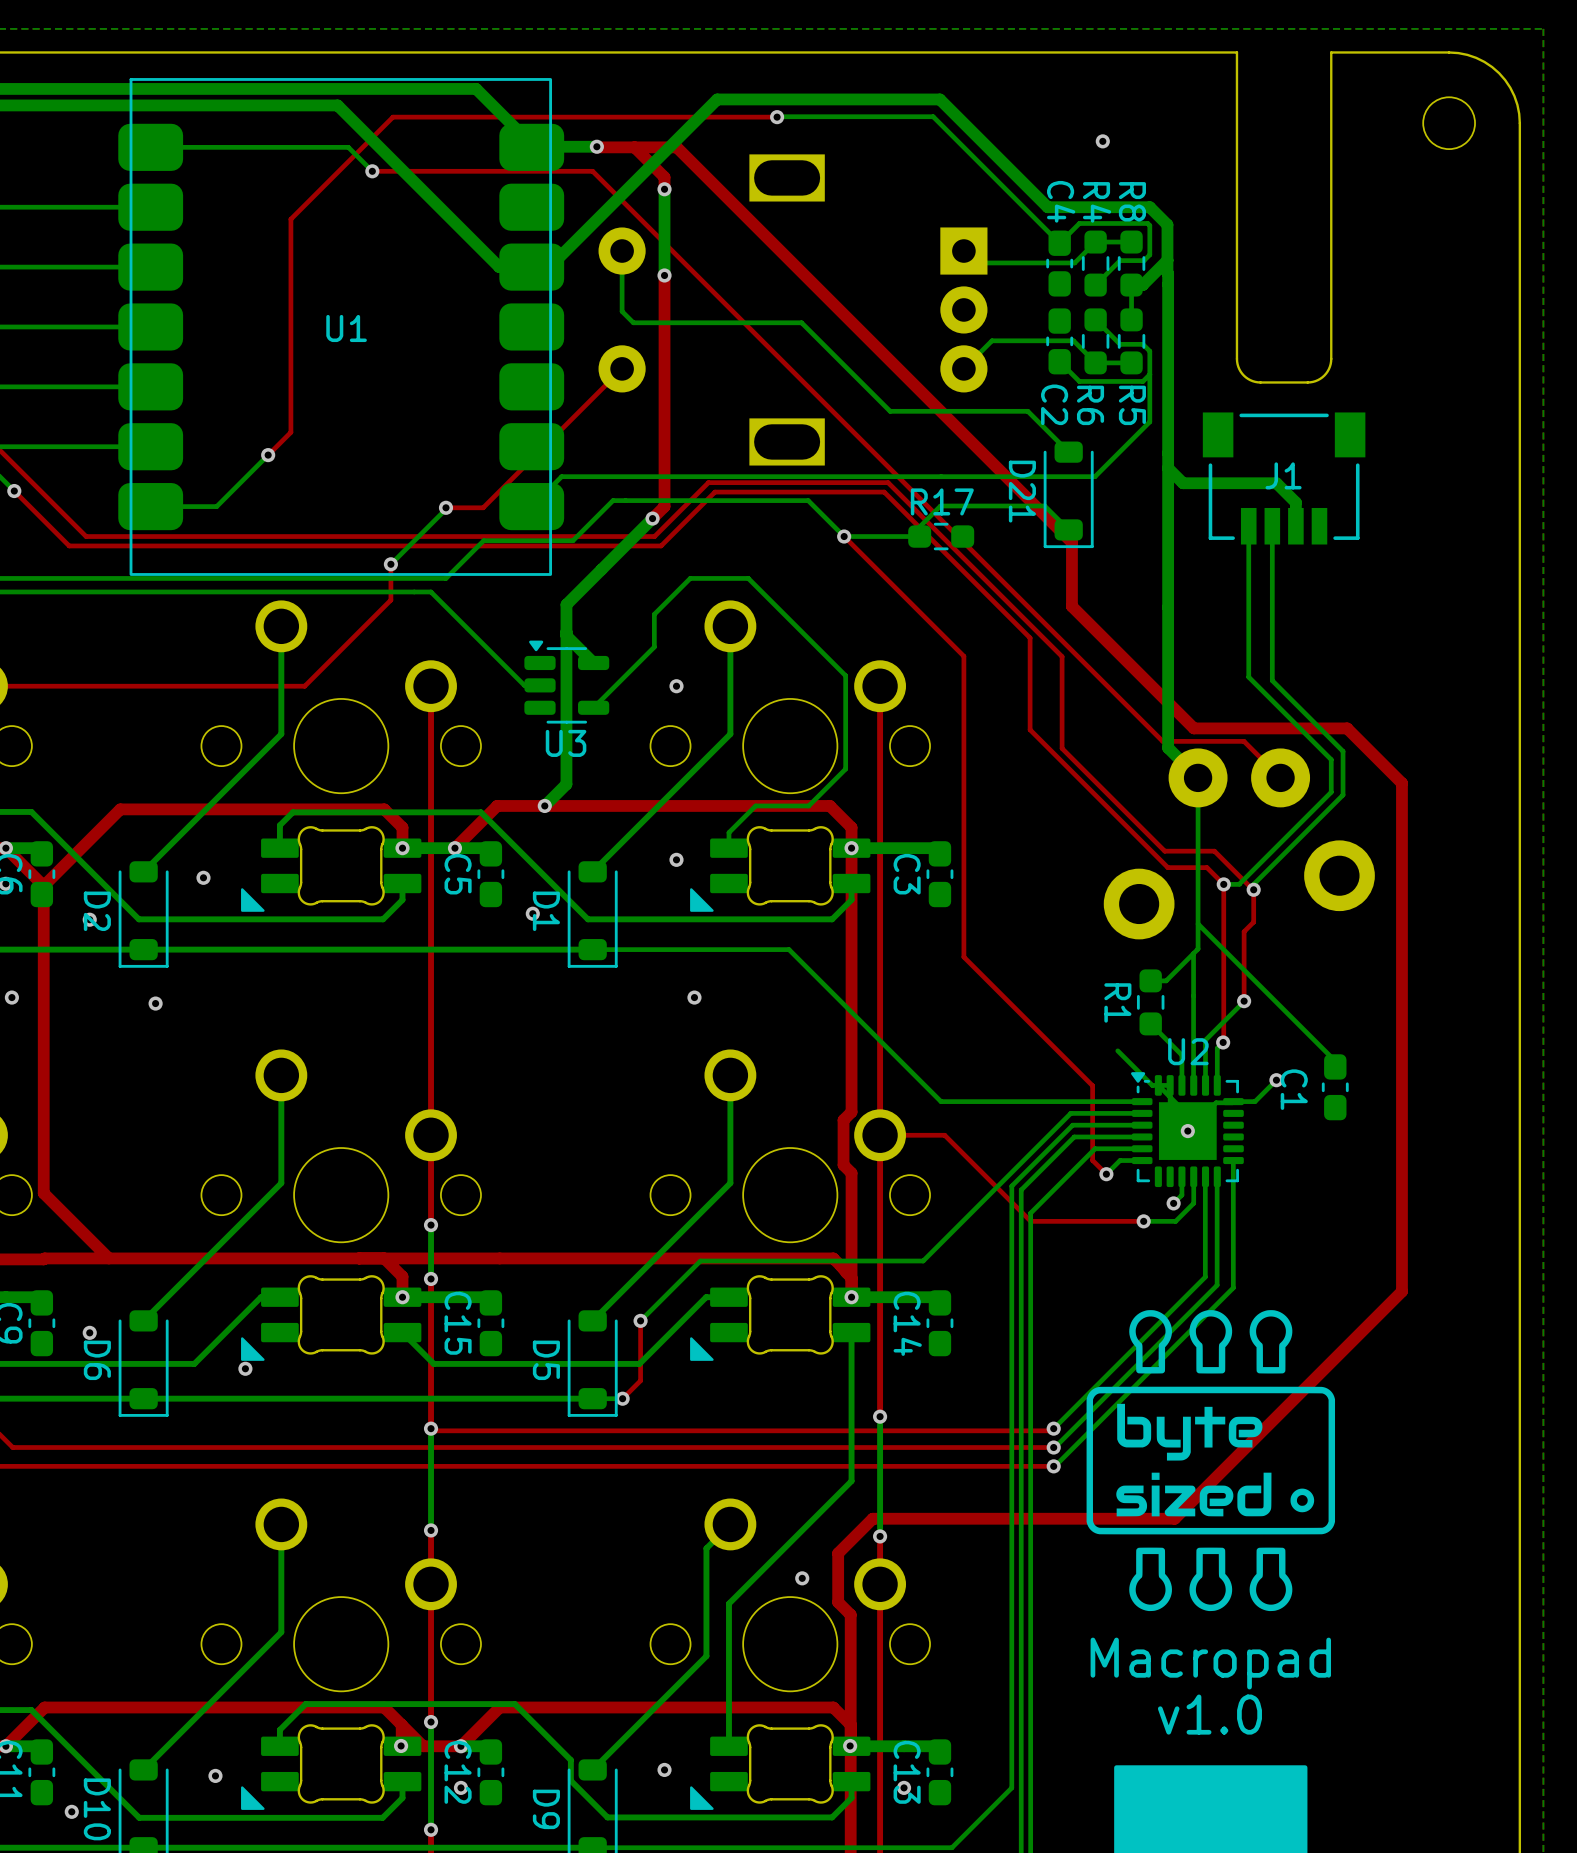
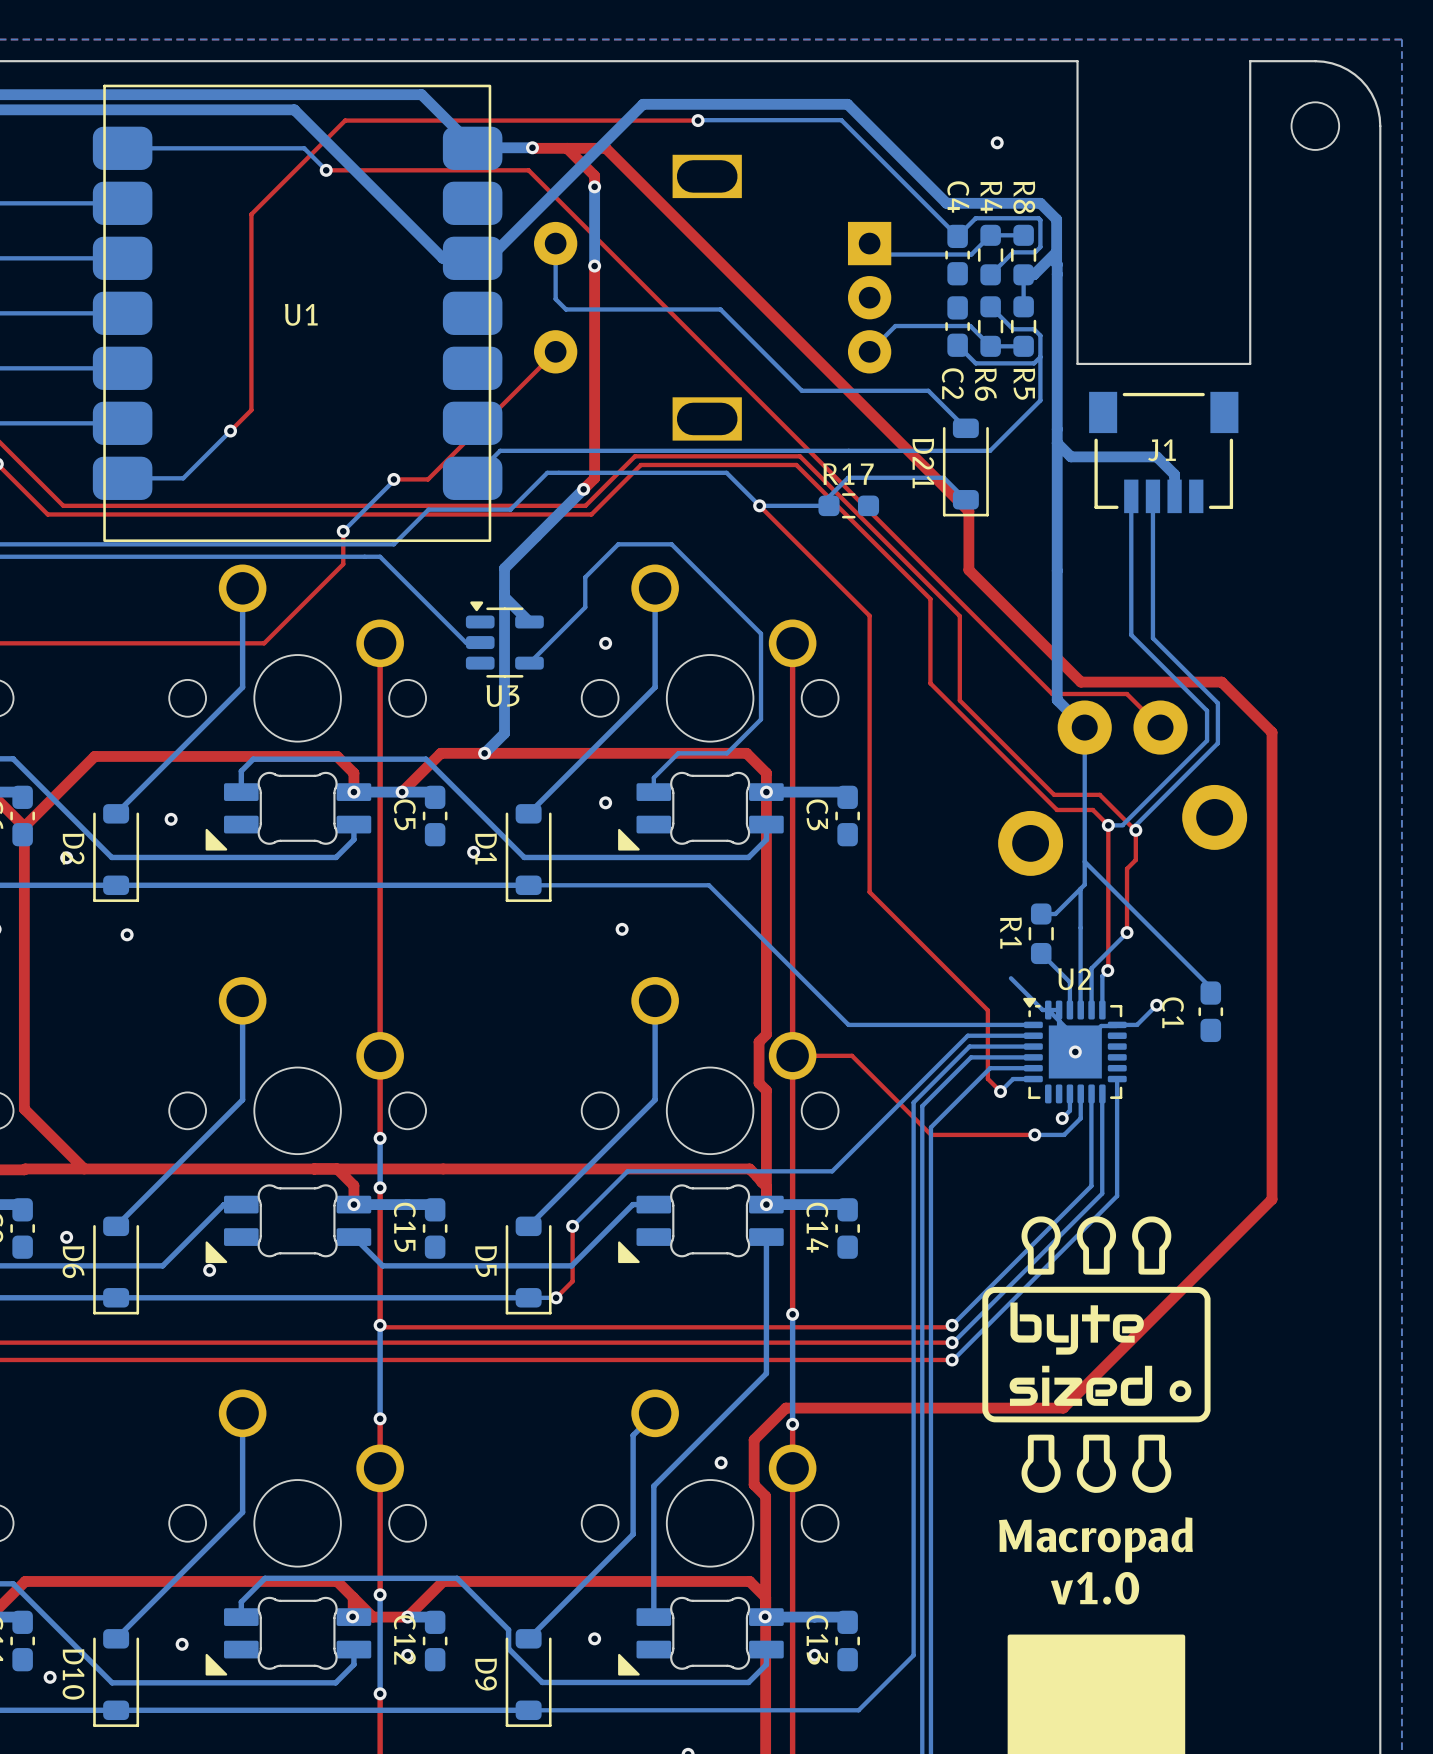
board edge: (1378, 52) (1331, 52) (1331, 361) (1328, 369) (1322, 377) (1307, 382) (1255, 381) (1243, 375) (1238, 366) (1236, 52) (1190, 52) -> (1250, 61) (1250, 363) (1077, 363) (1077, 61)

